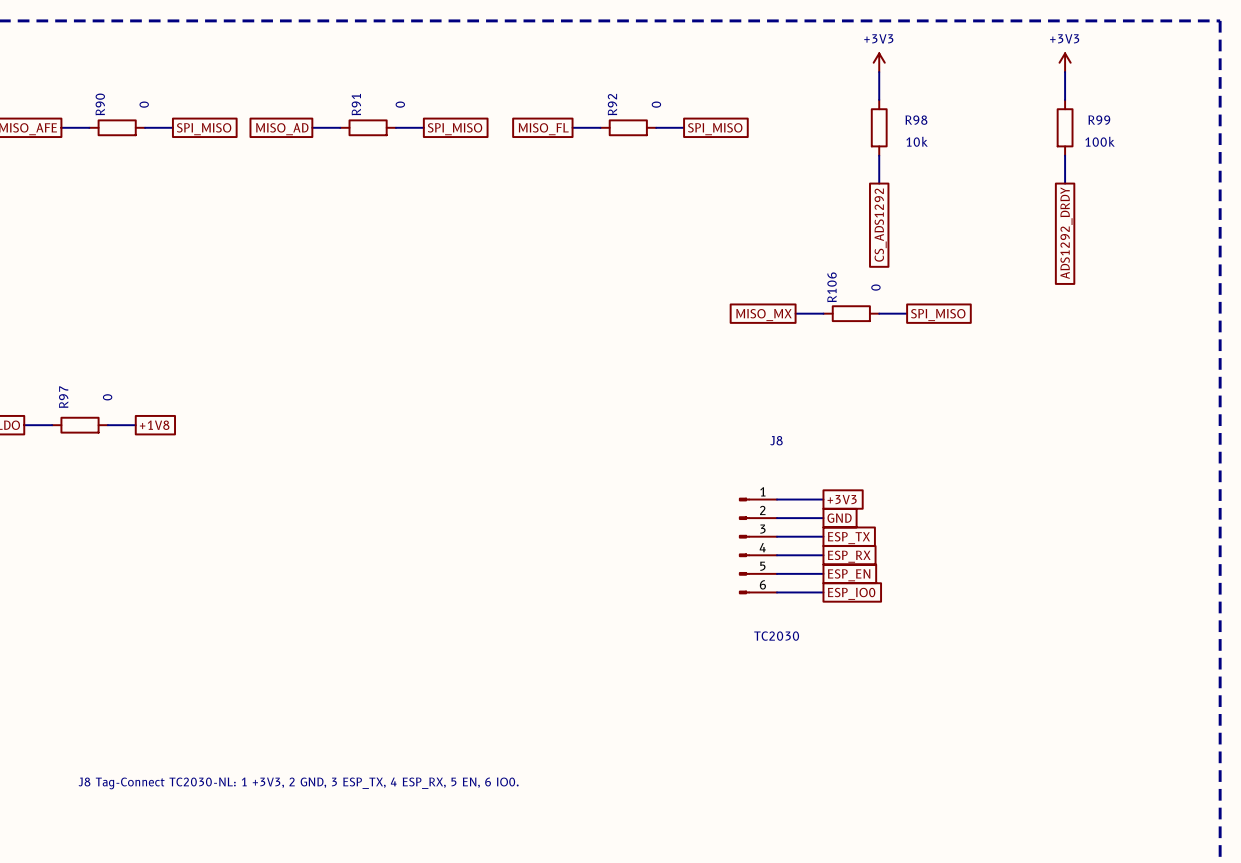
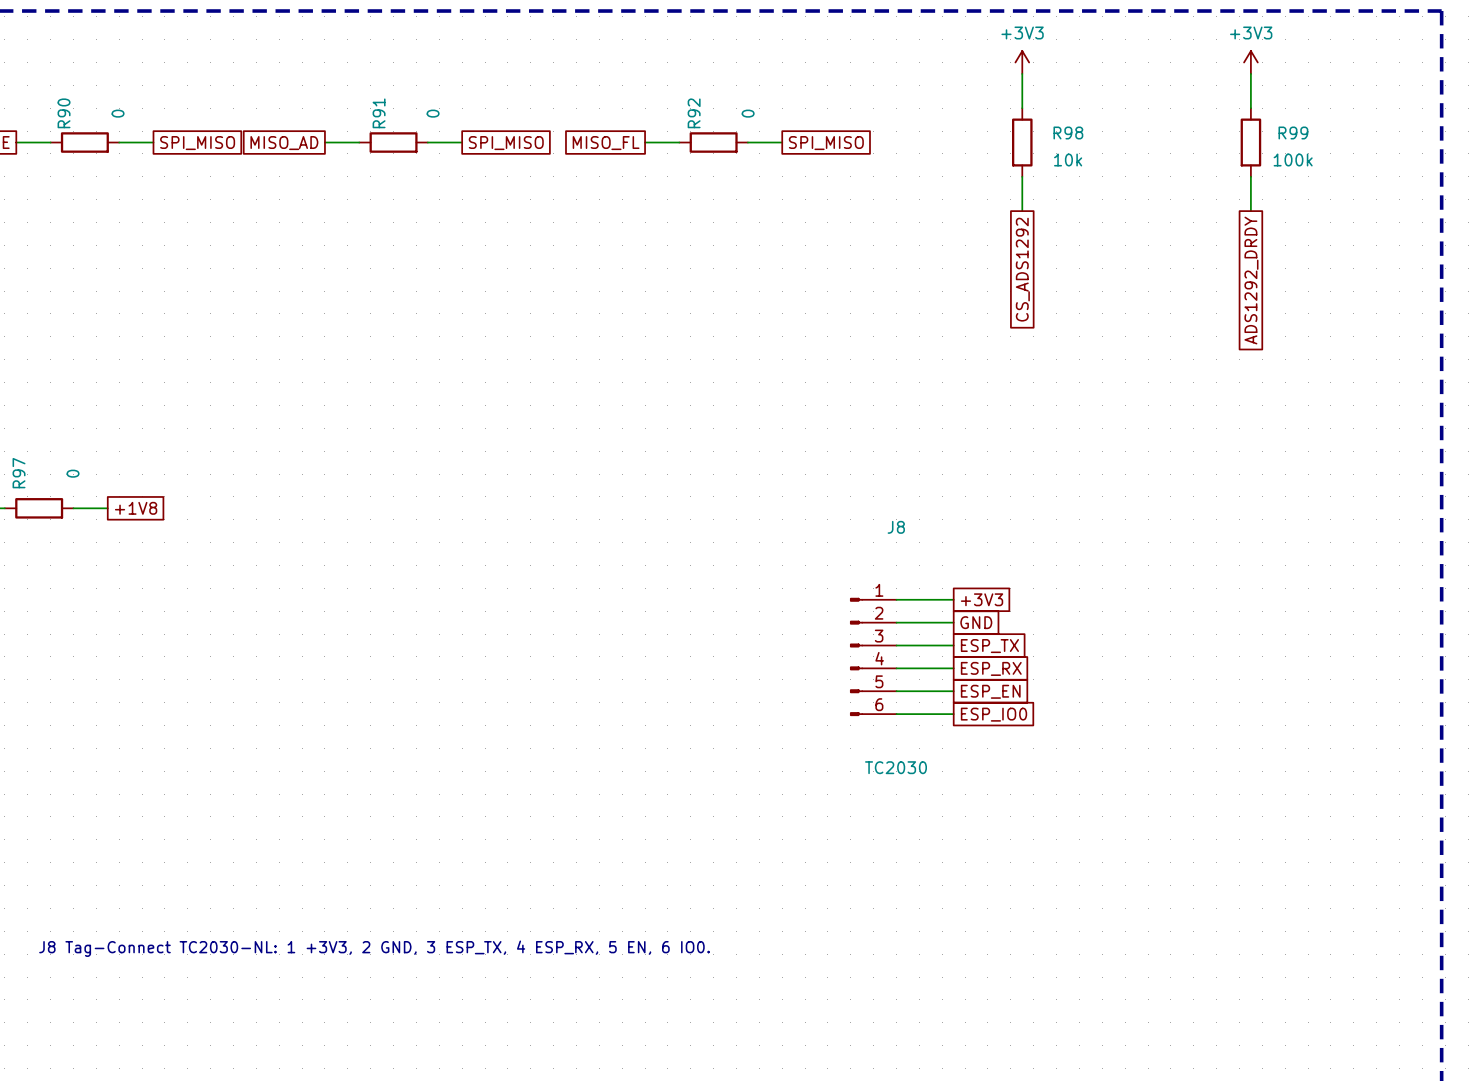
wire: (795, 313) (823, 313) -> none
R106: 0 (851, 313) -> none
wire: (879, 313) (907, 313) -> none
global label: MISO_MX (763, 315) -> none
global label: SPI_MISO (938, 315) -> none

